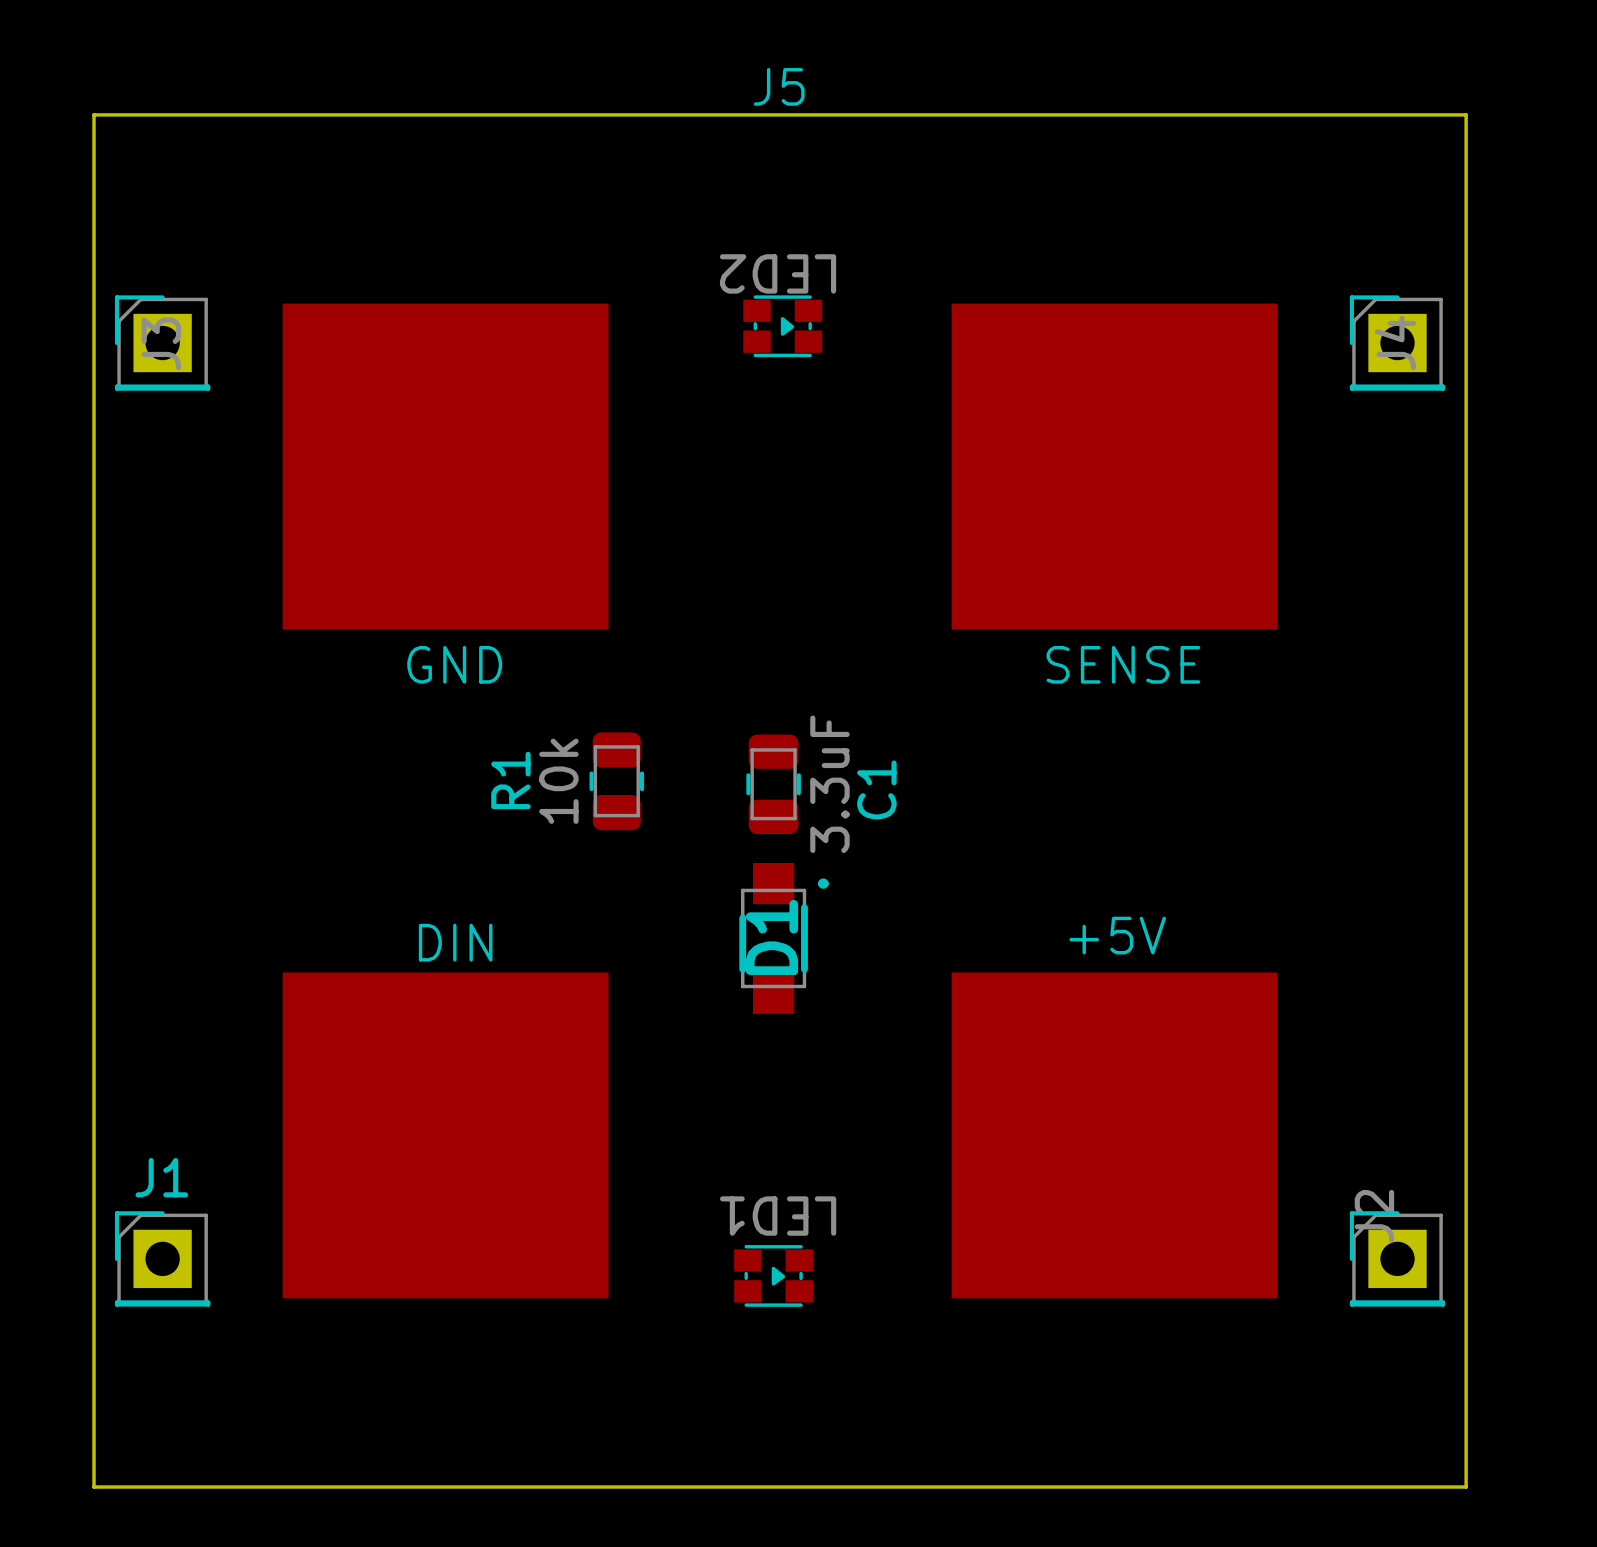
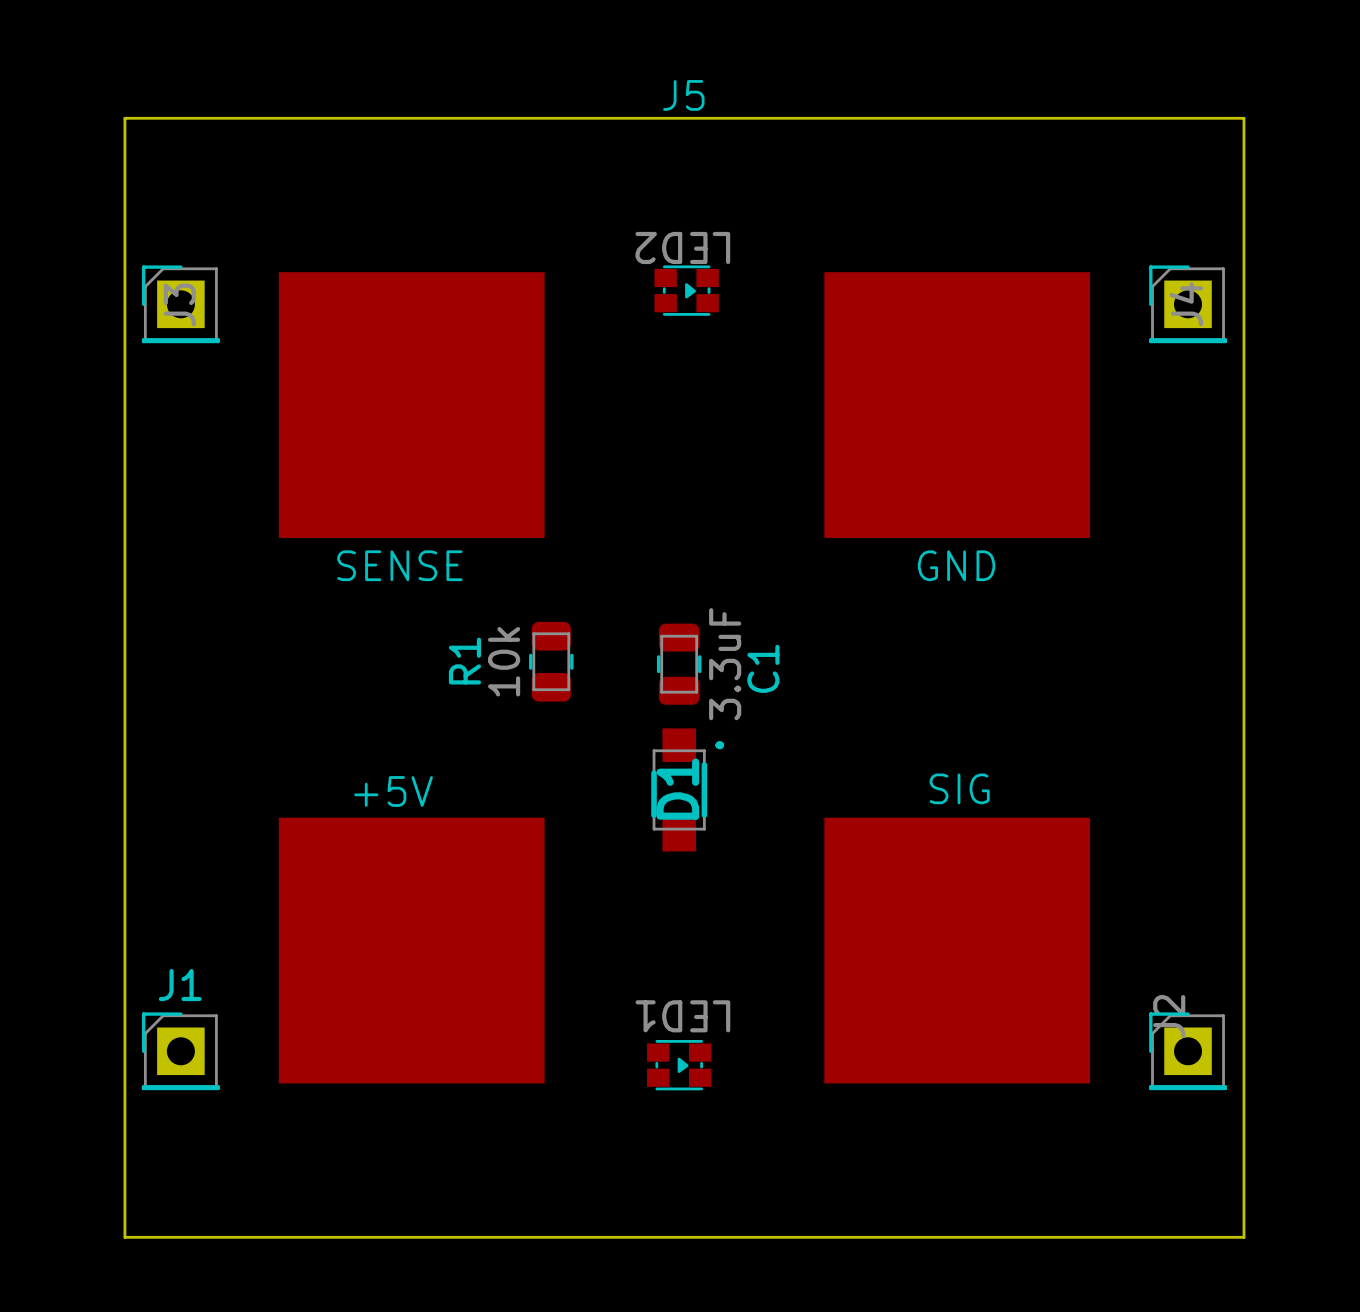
J5 text position: GND (454, 664) -> GND (956, 565)
J5 text position: SENSE (1123, 664) -> SENSE (399, 565)
J5 text position: +5V (1117, 935) -> +5V (393, 791)
J5 text: none -> SIG (959, 788)
J5 text: DIN (455, 942) -> none

